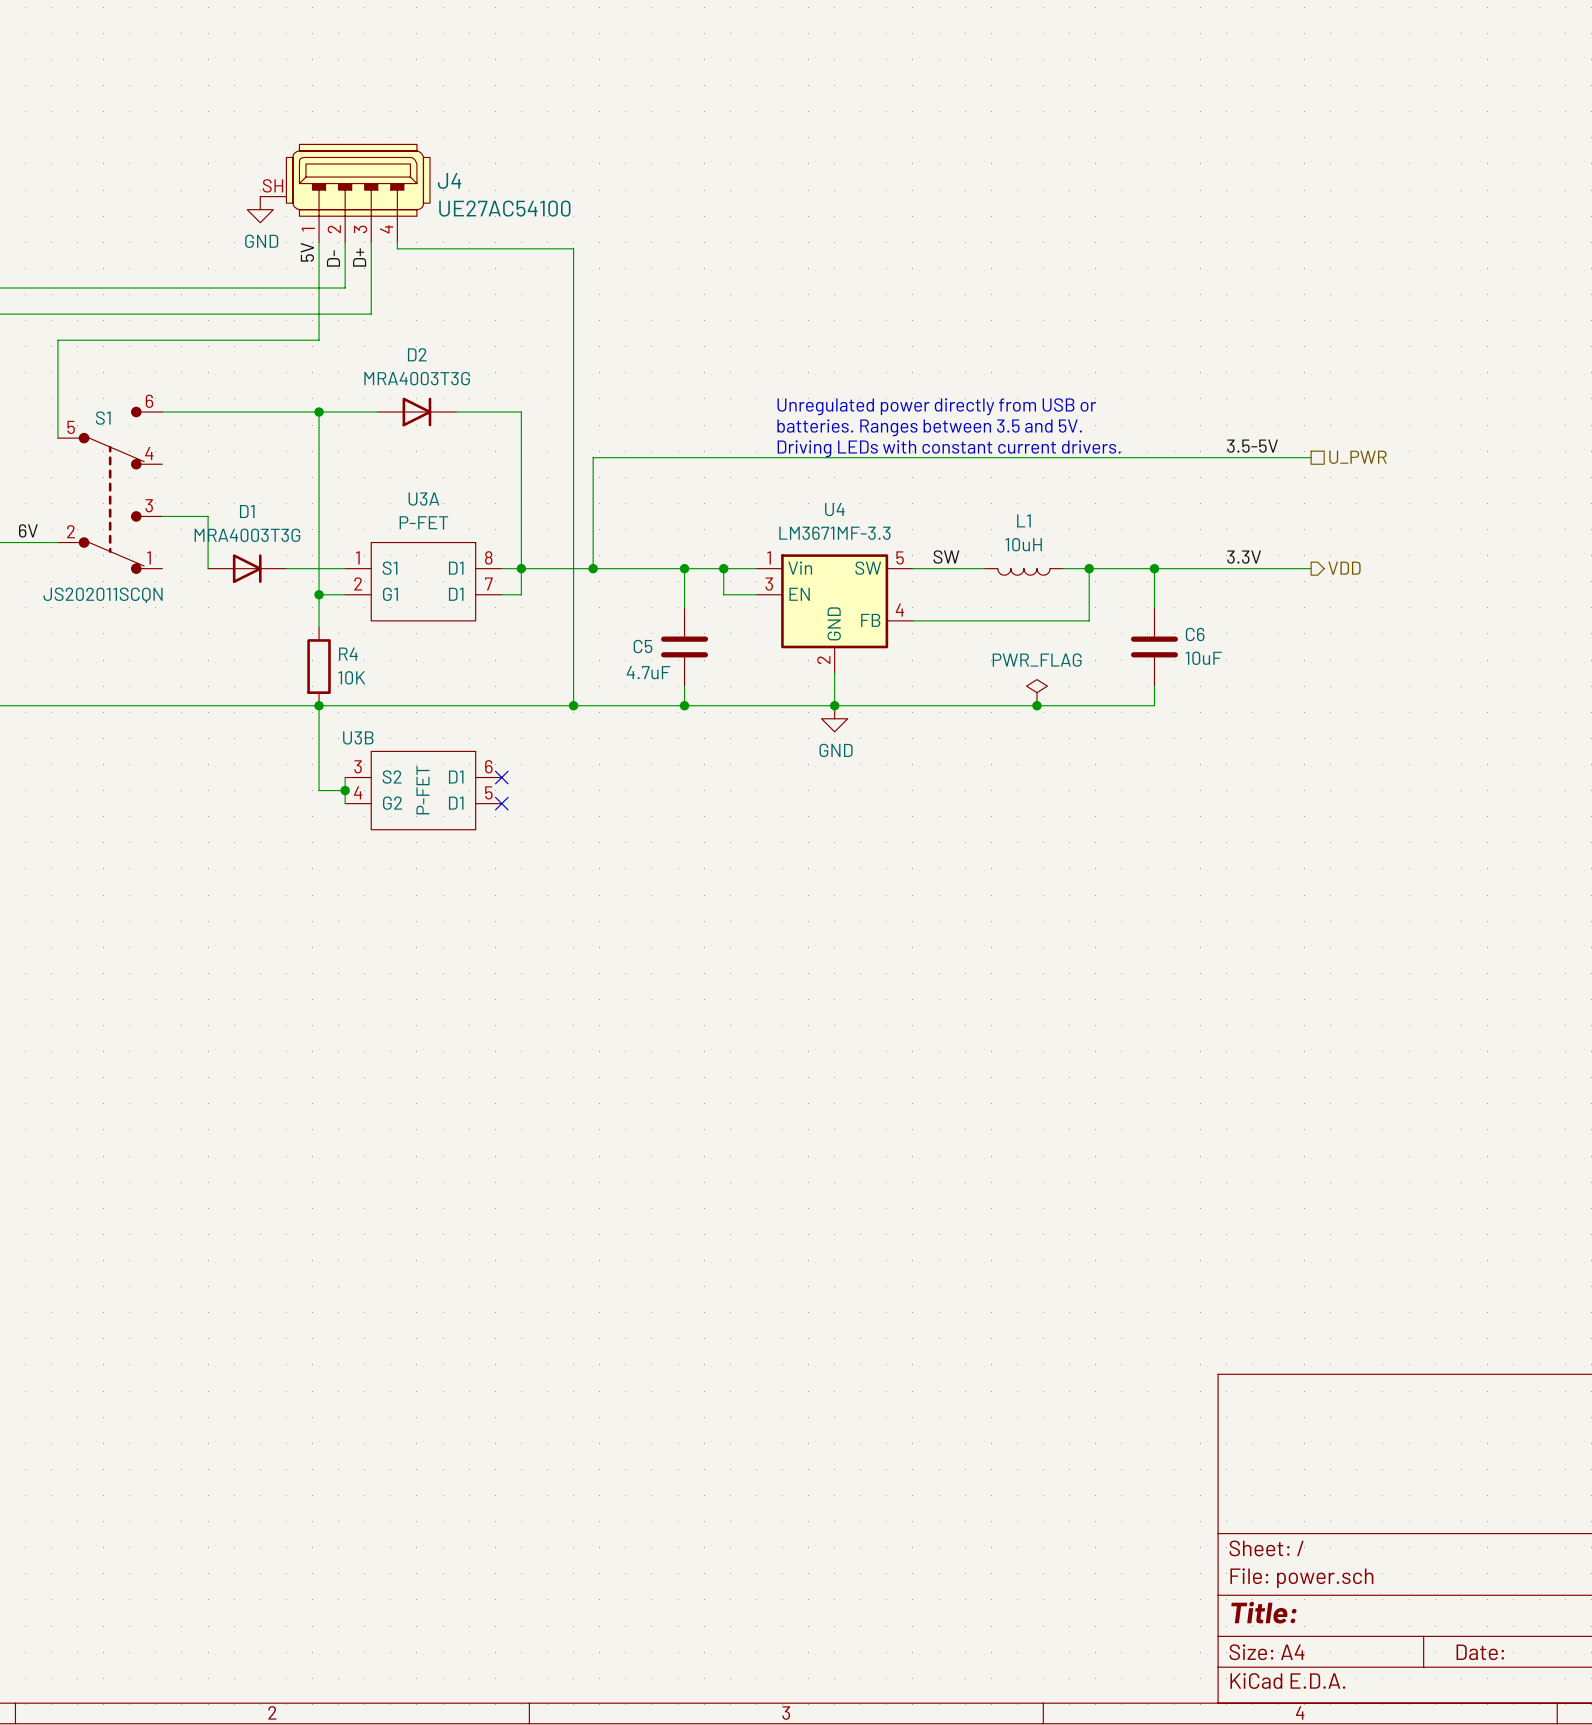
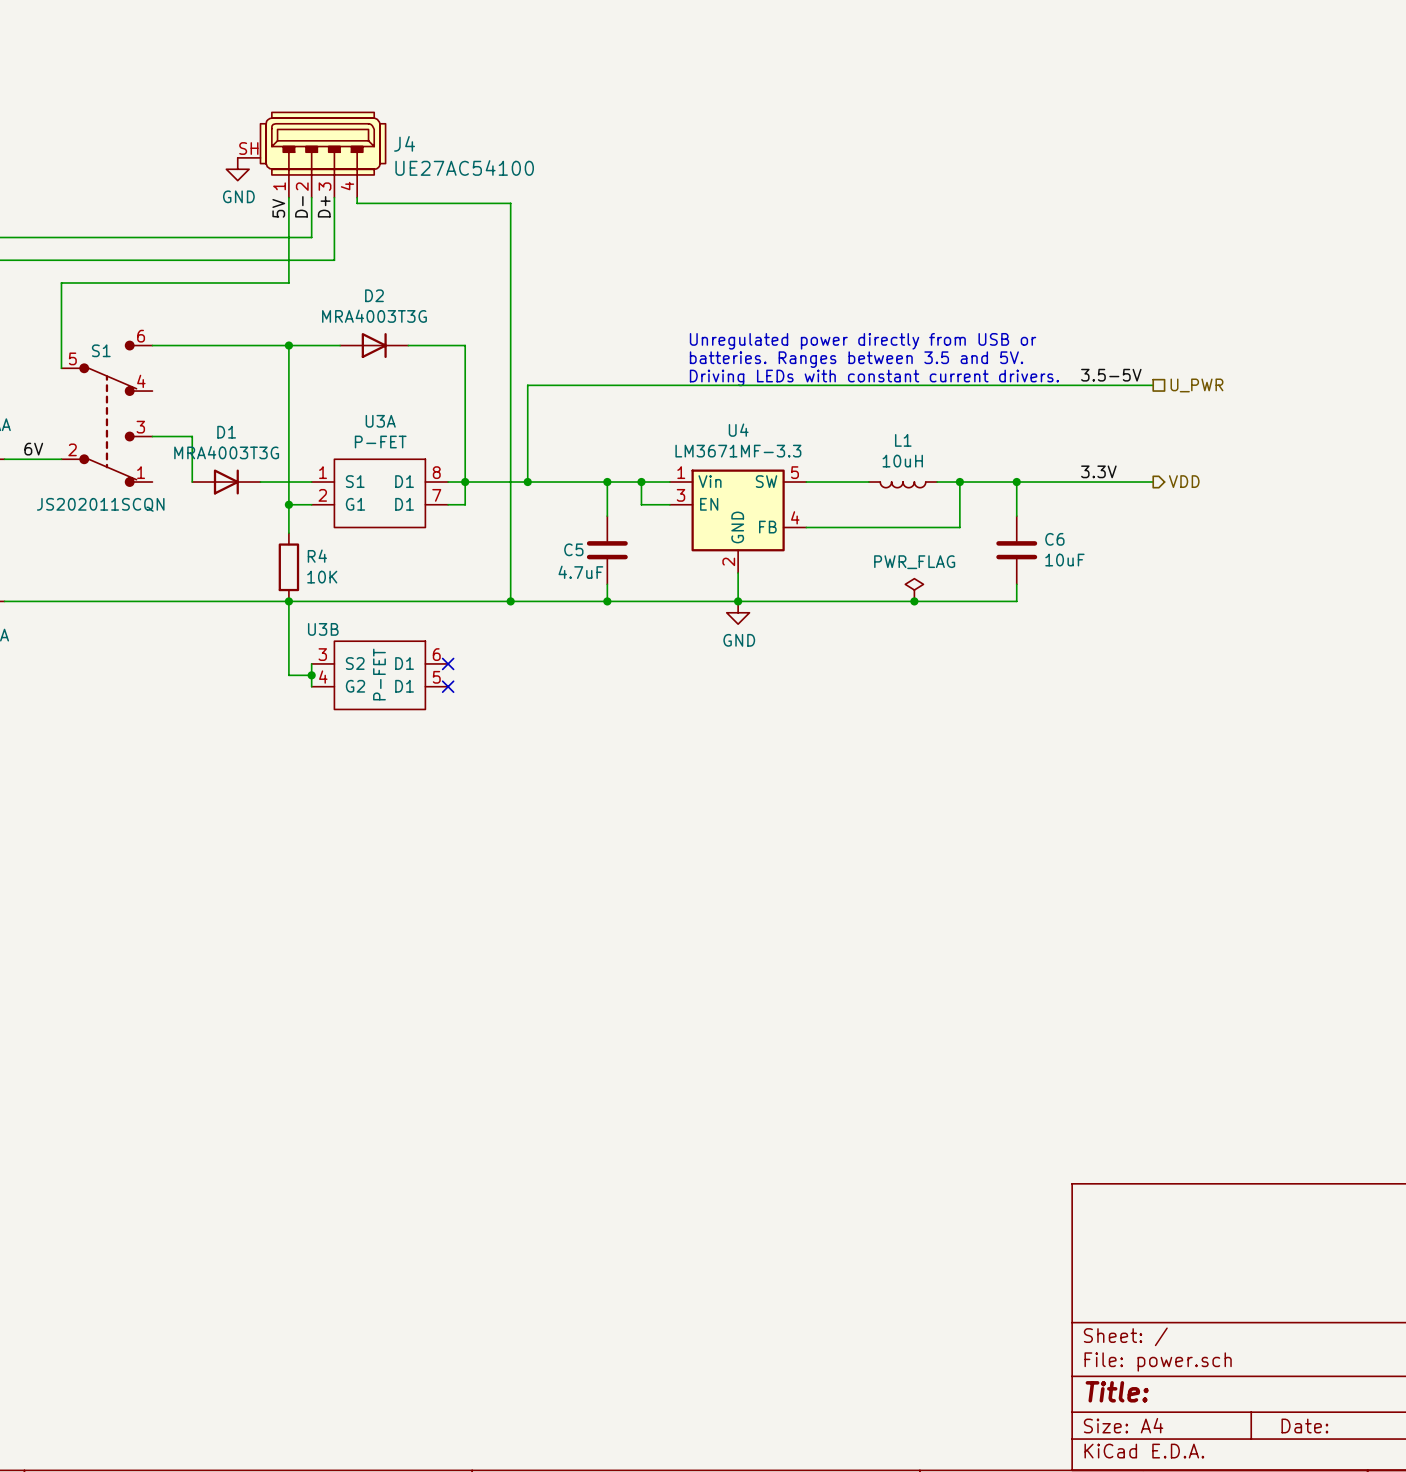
label: SW (946, 557) -> none

